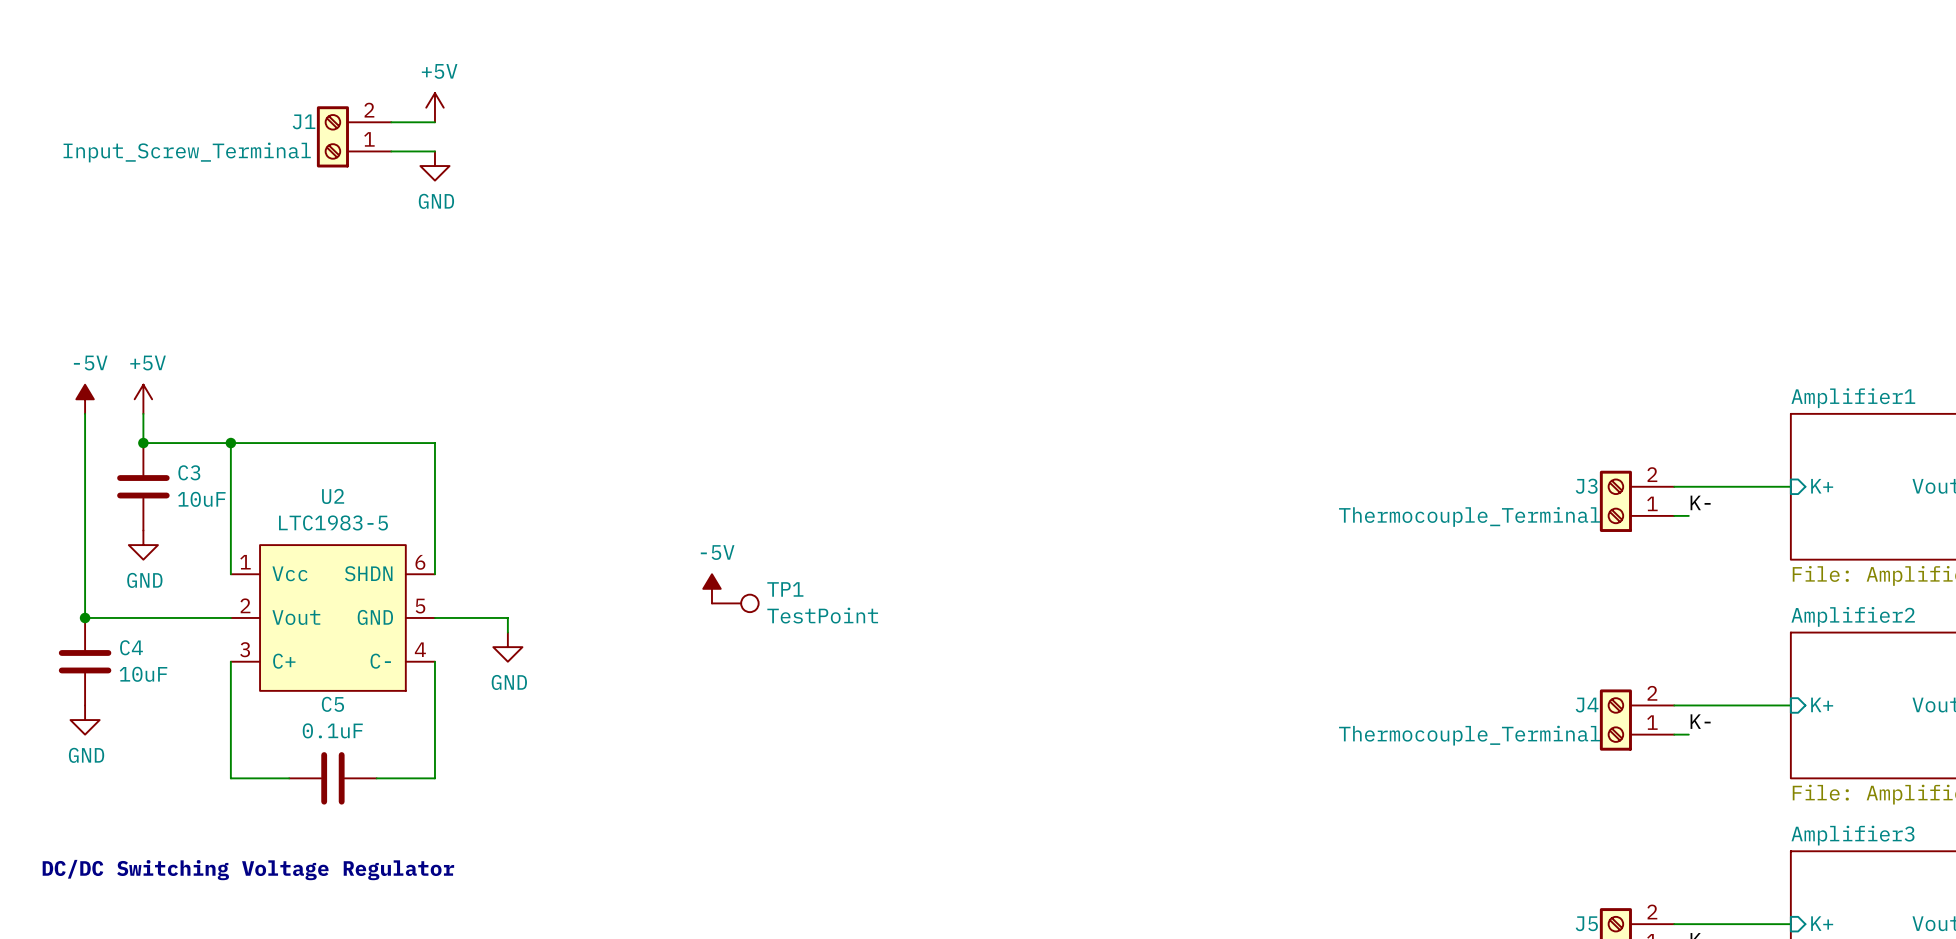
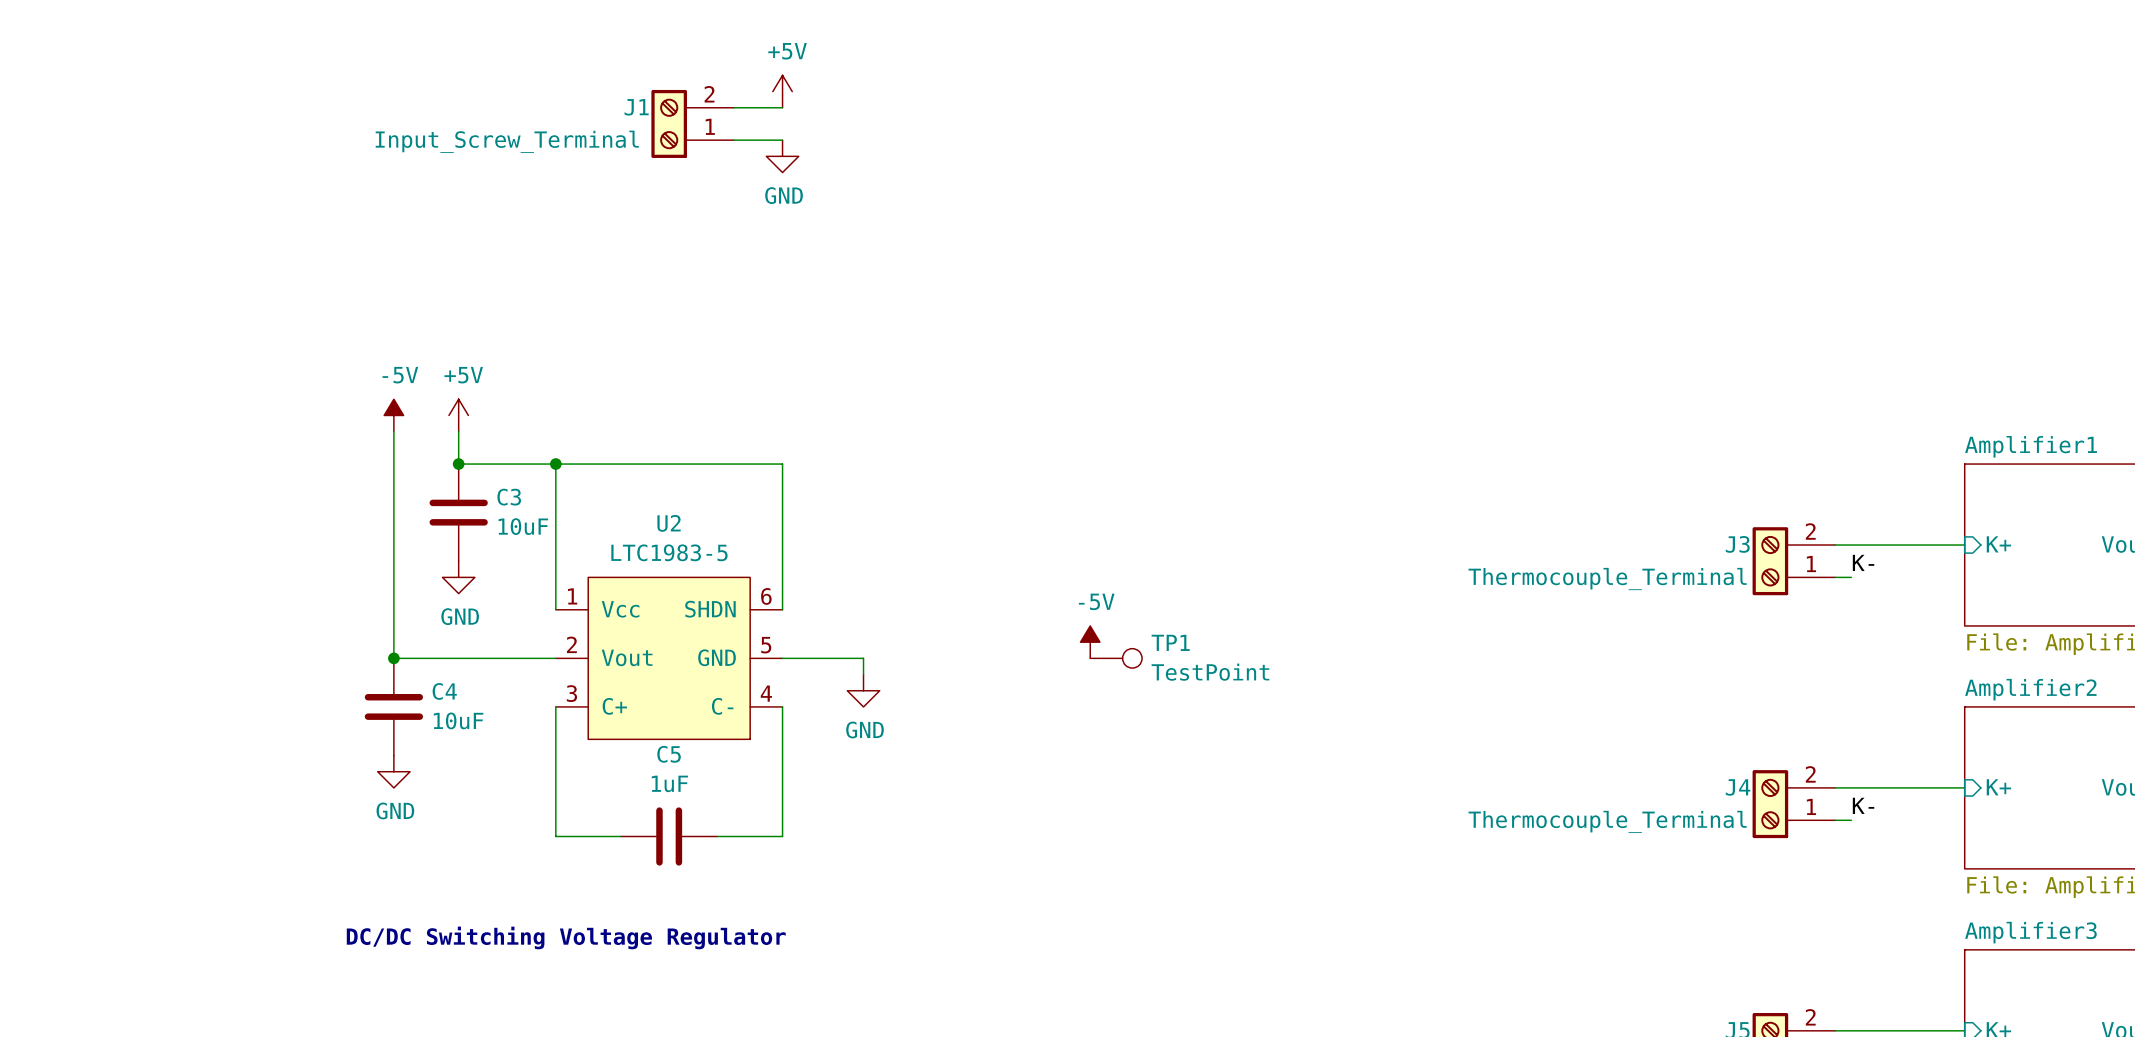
power symbol: none -> +5V (782, 91)
wire: none -> (733, 107) (782, 107)
power symbol: +5V (434, 107) -> none
wire: (391, 122) (434, 122) -> none
wire: none -> (733, 140) (782, 140)
J1 position: (354, 136) -> (692, 123)
power symbol: none -> GND (782, 156)
wire: (391, 151) (434, 151) -> none
power symbol: GND (434, 166) -> none
power symbol: none -> -5V (393, 415)
power symbol: none -> +5V (458, 415)
wire: none -> (393, 431) (393, 658) (555, 658)
wire: none -> (458, 431) (458, 464) (782, 464) (782, 609)
power symbol: -5V (85, 399) -> none
power symbol: +5V (143, 399) -> none
wire: (85, 413) (85, 617) (230, 617) -> none
wire: (143, 413) (143, 443) (434, 443) (434, 574) -> none
junction: none -> (458, 464)
wire: none -> (555, 464) (555, 609)
junction: none -> (555, 464)
junction: (143, 443) -> none
wire: (230, 443) (230, 574) -> none
junction: (230, 443) -> none
C3 position: (143, 486) -> (458, 512)
power symbol: none -> GND (458, 577)
power symbol: GND (143, 545) -> none
power symbol: none -> -5V (1090, 642)
junction: none -> (393, 658)
power symbol: -5V (711, 588) -> none
wire: none -> (782, 658) (863, 658) (863, 674)
TP1 position: (735, 603) -> (1116, 658)
junction: (85, 617) -> none
U2 position: (332, 617) -> (669, 658)
wire: (434, 617) (507, 617) (507, 632) -> none
power symbol: none -> GND (863, 690)
wire: none -> (555, 706) (555, 836) (620, 836)
wire: none -> (782, 706) (782, 836) (717, 836)
power symbol: GND (507, 647) -> none
C4 position: (85, 661) -> (393, 706)
wire: (230, 661) (230, 778) (289, 778) -> none
wire: (434, 661) (434, 778) (376, 778) -> none
power symbol: none -> GND (393, 771)
power symbol: GND (85, 720) -> none
C5 value: 0.1uF (332, 730) -> 1uF (669, 783)
C5 position: (332, 778) -> (669, 836)
text: none -> DC/DC Switching Voltage Regulator (566, 937)
text: DC/DC Switching Voltage Regulator (248, 870) -> none

